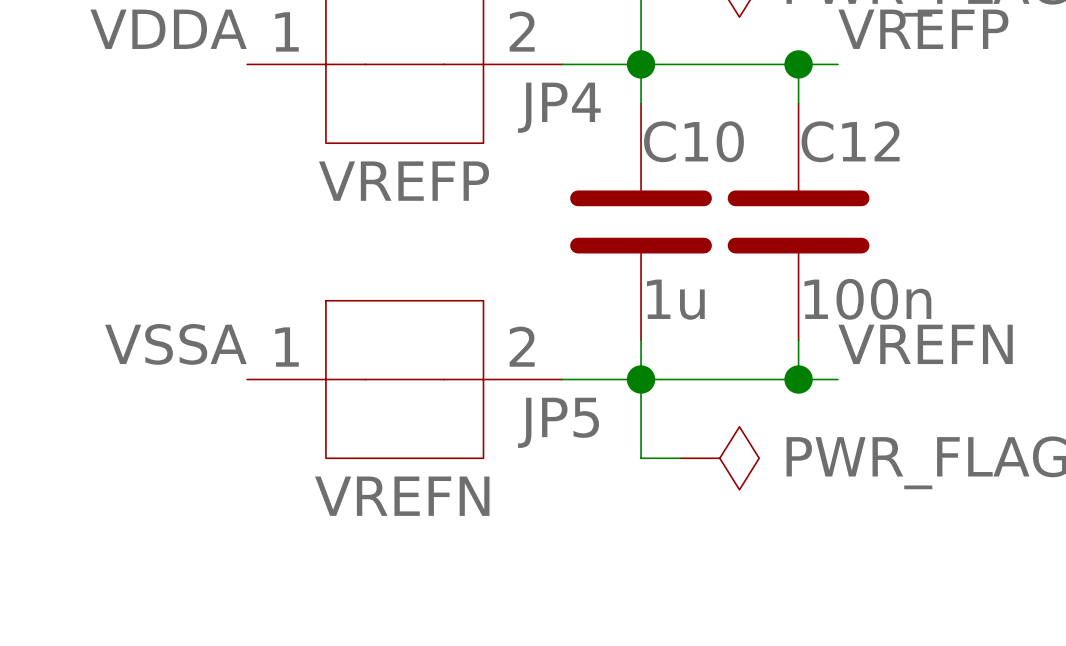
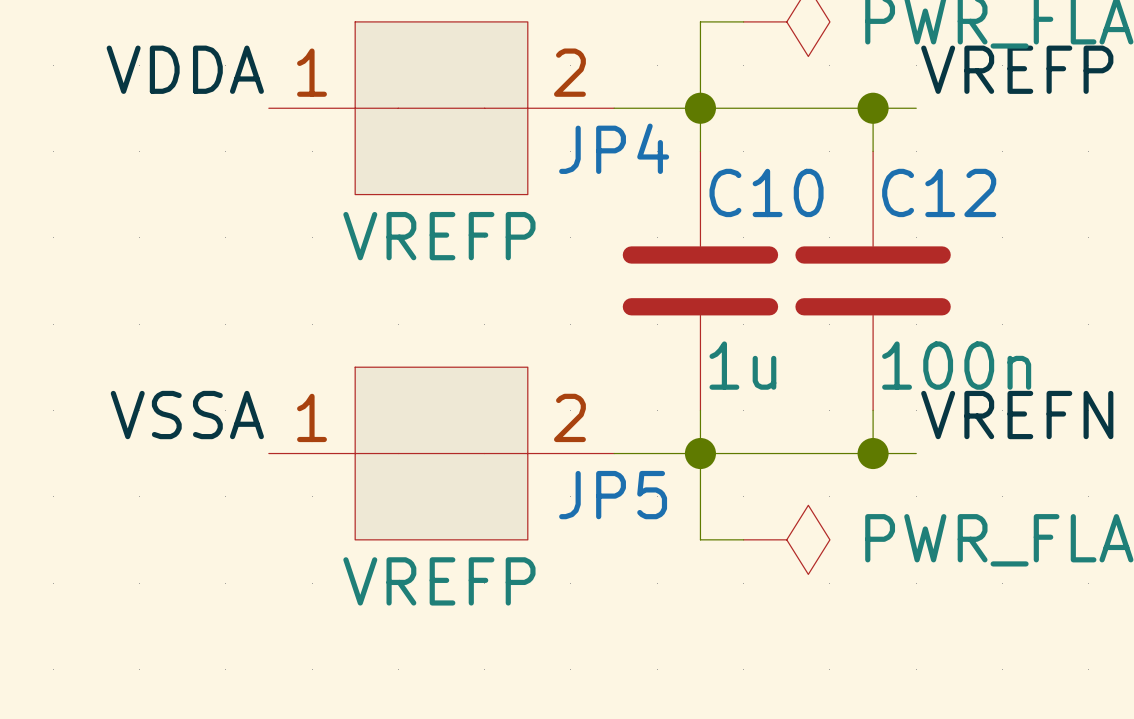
JP5 value: VREFN (402, 496) -> VREFP (439, 581)

